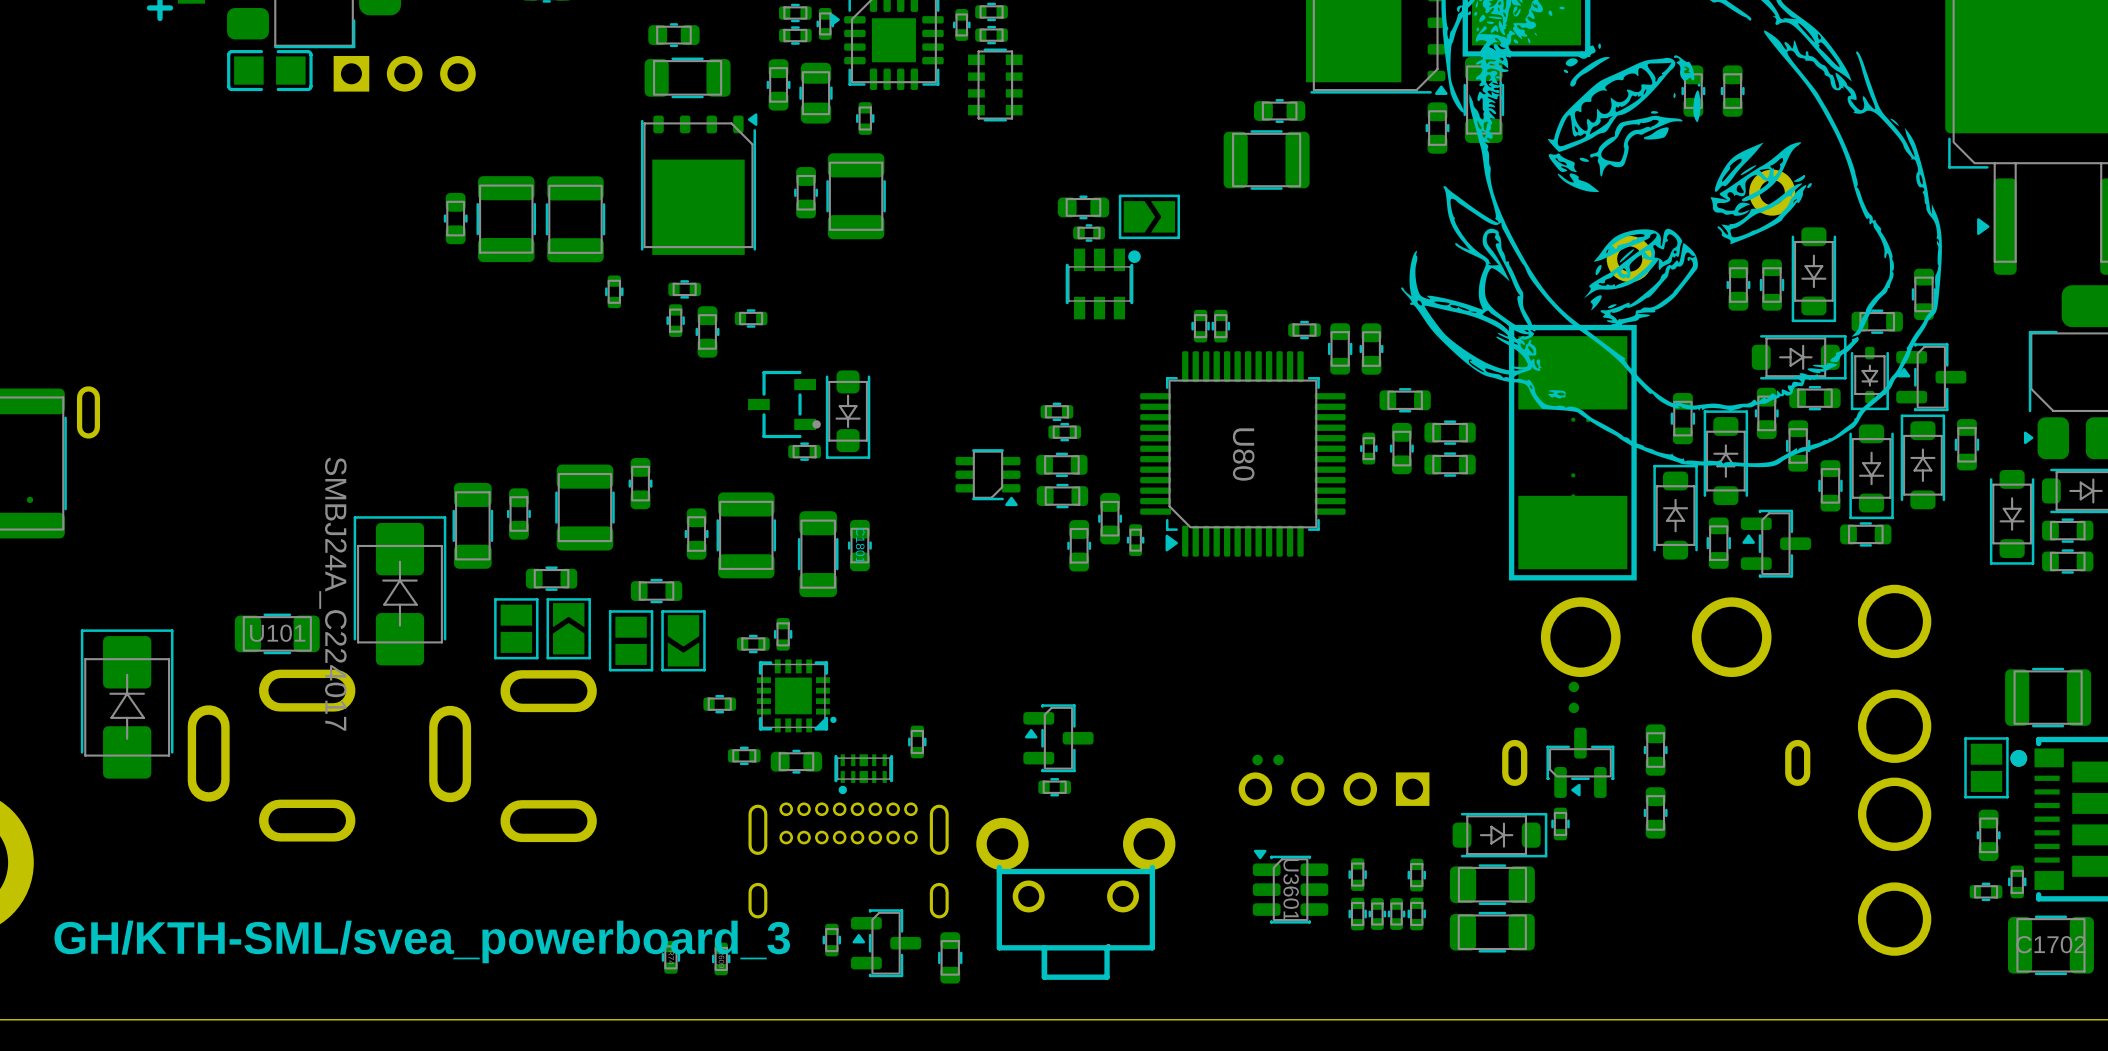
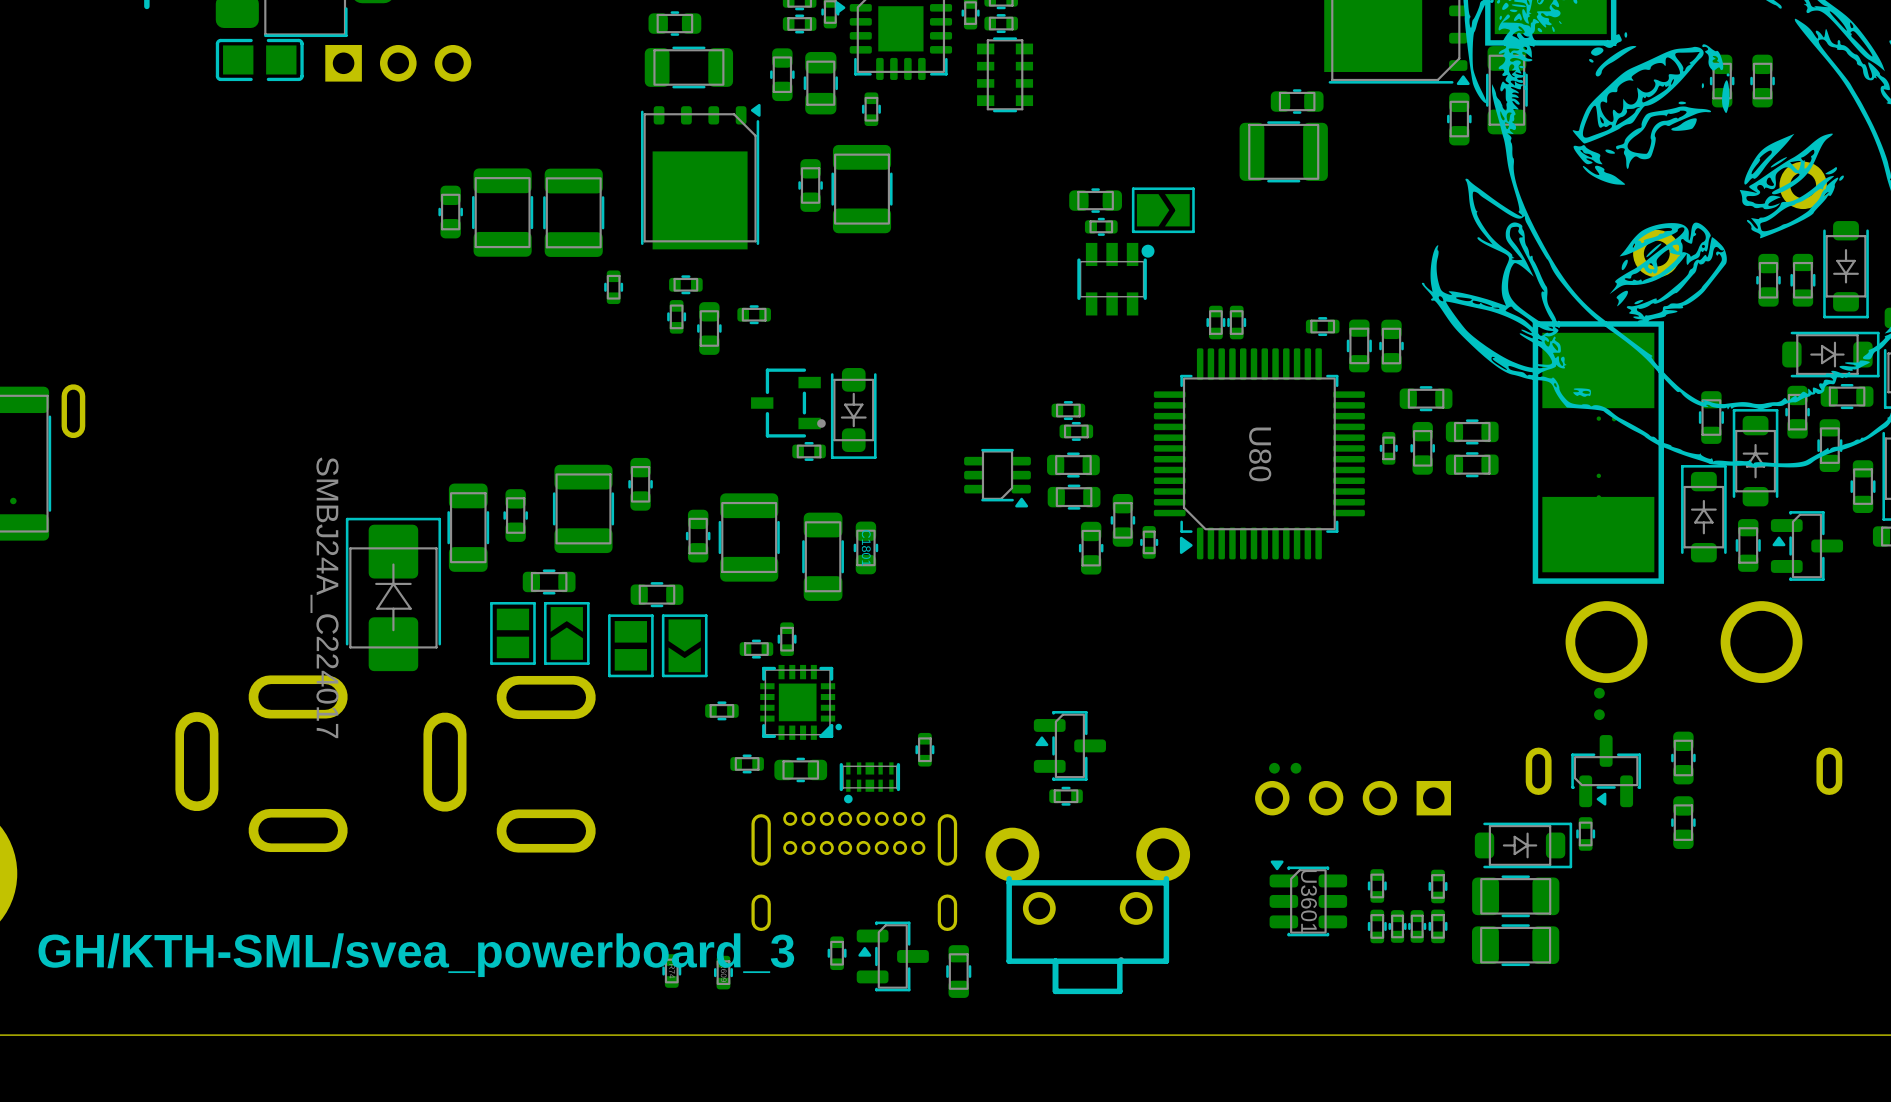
U101: (277, 633) -> none
part: (127, 704) -> none

